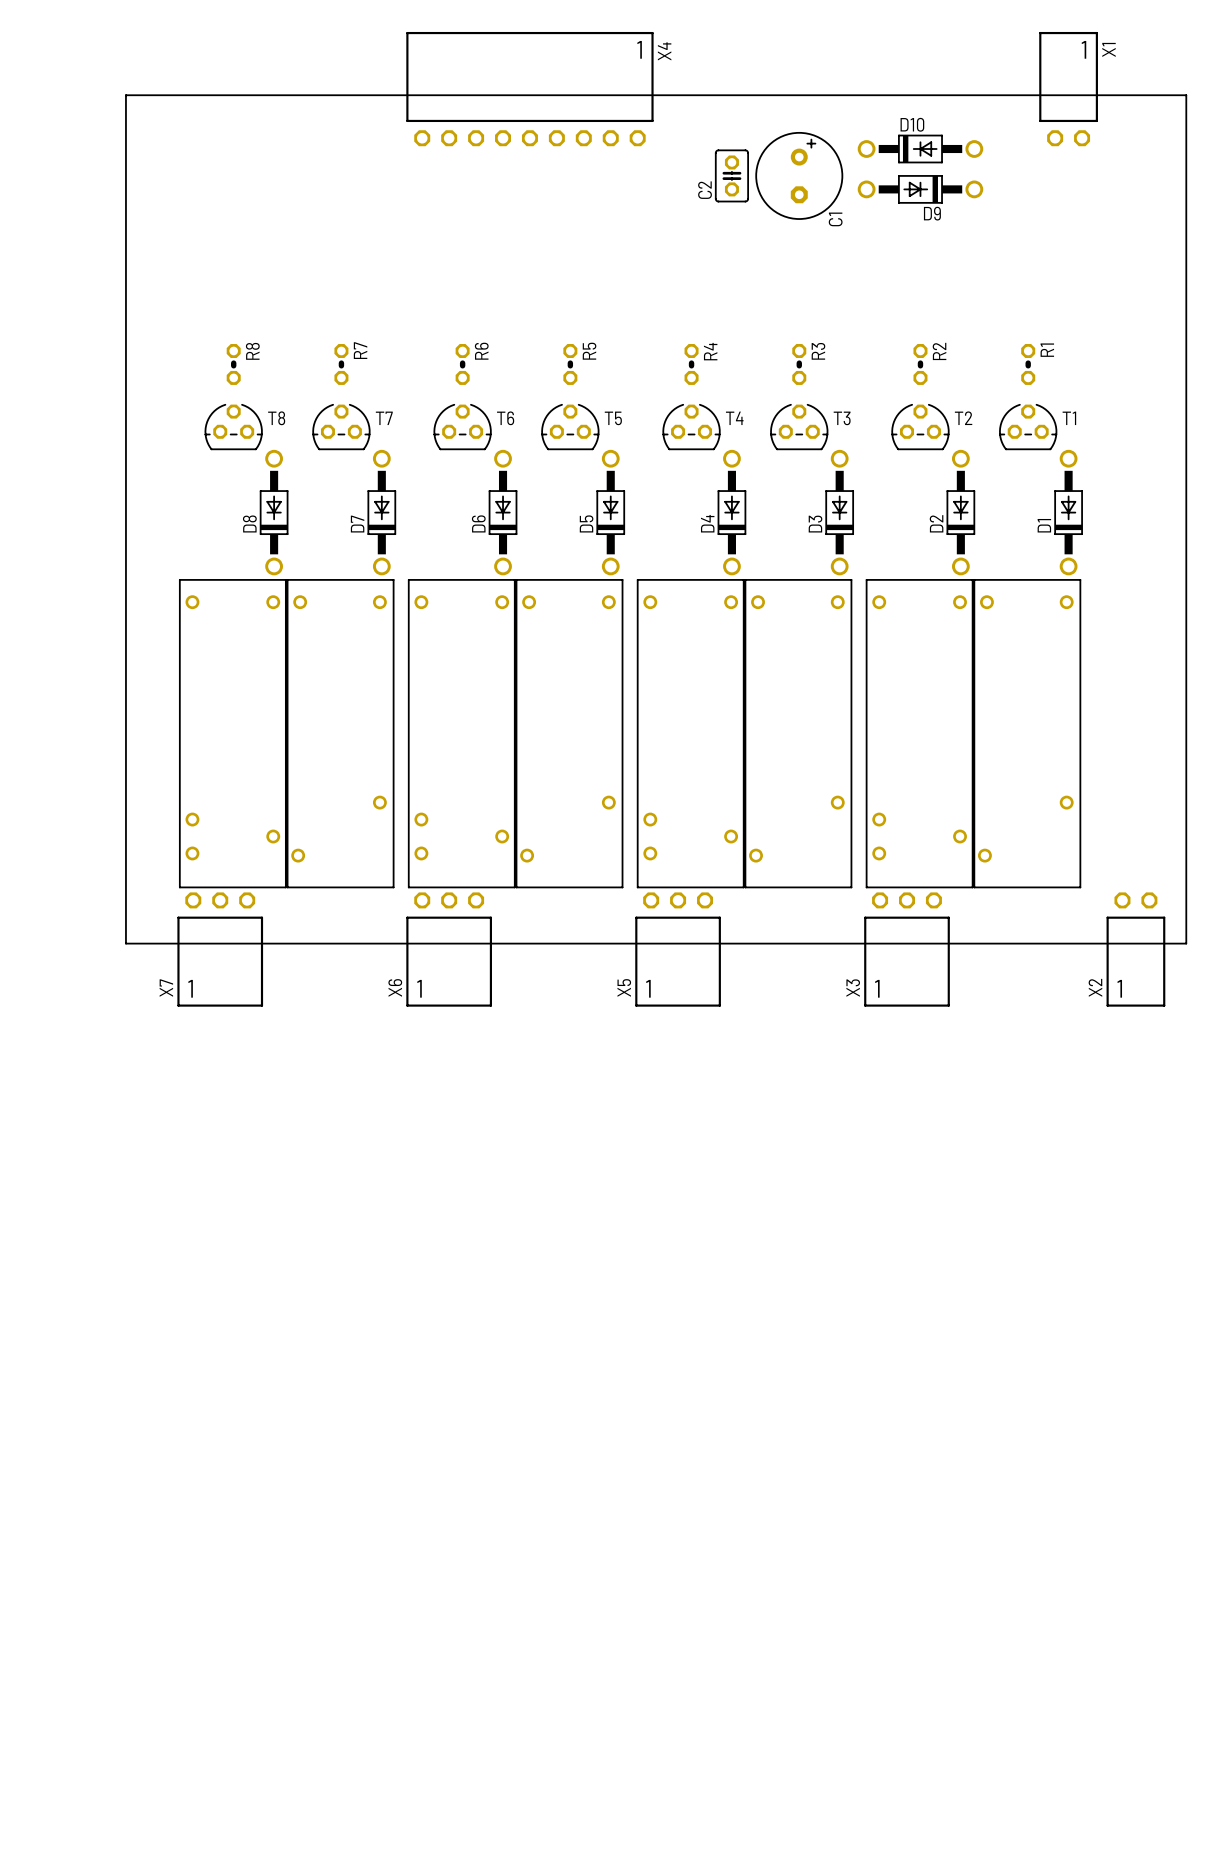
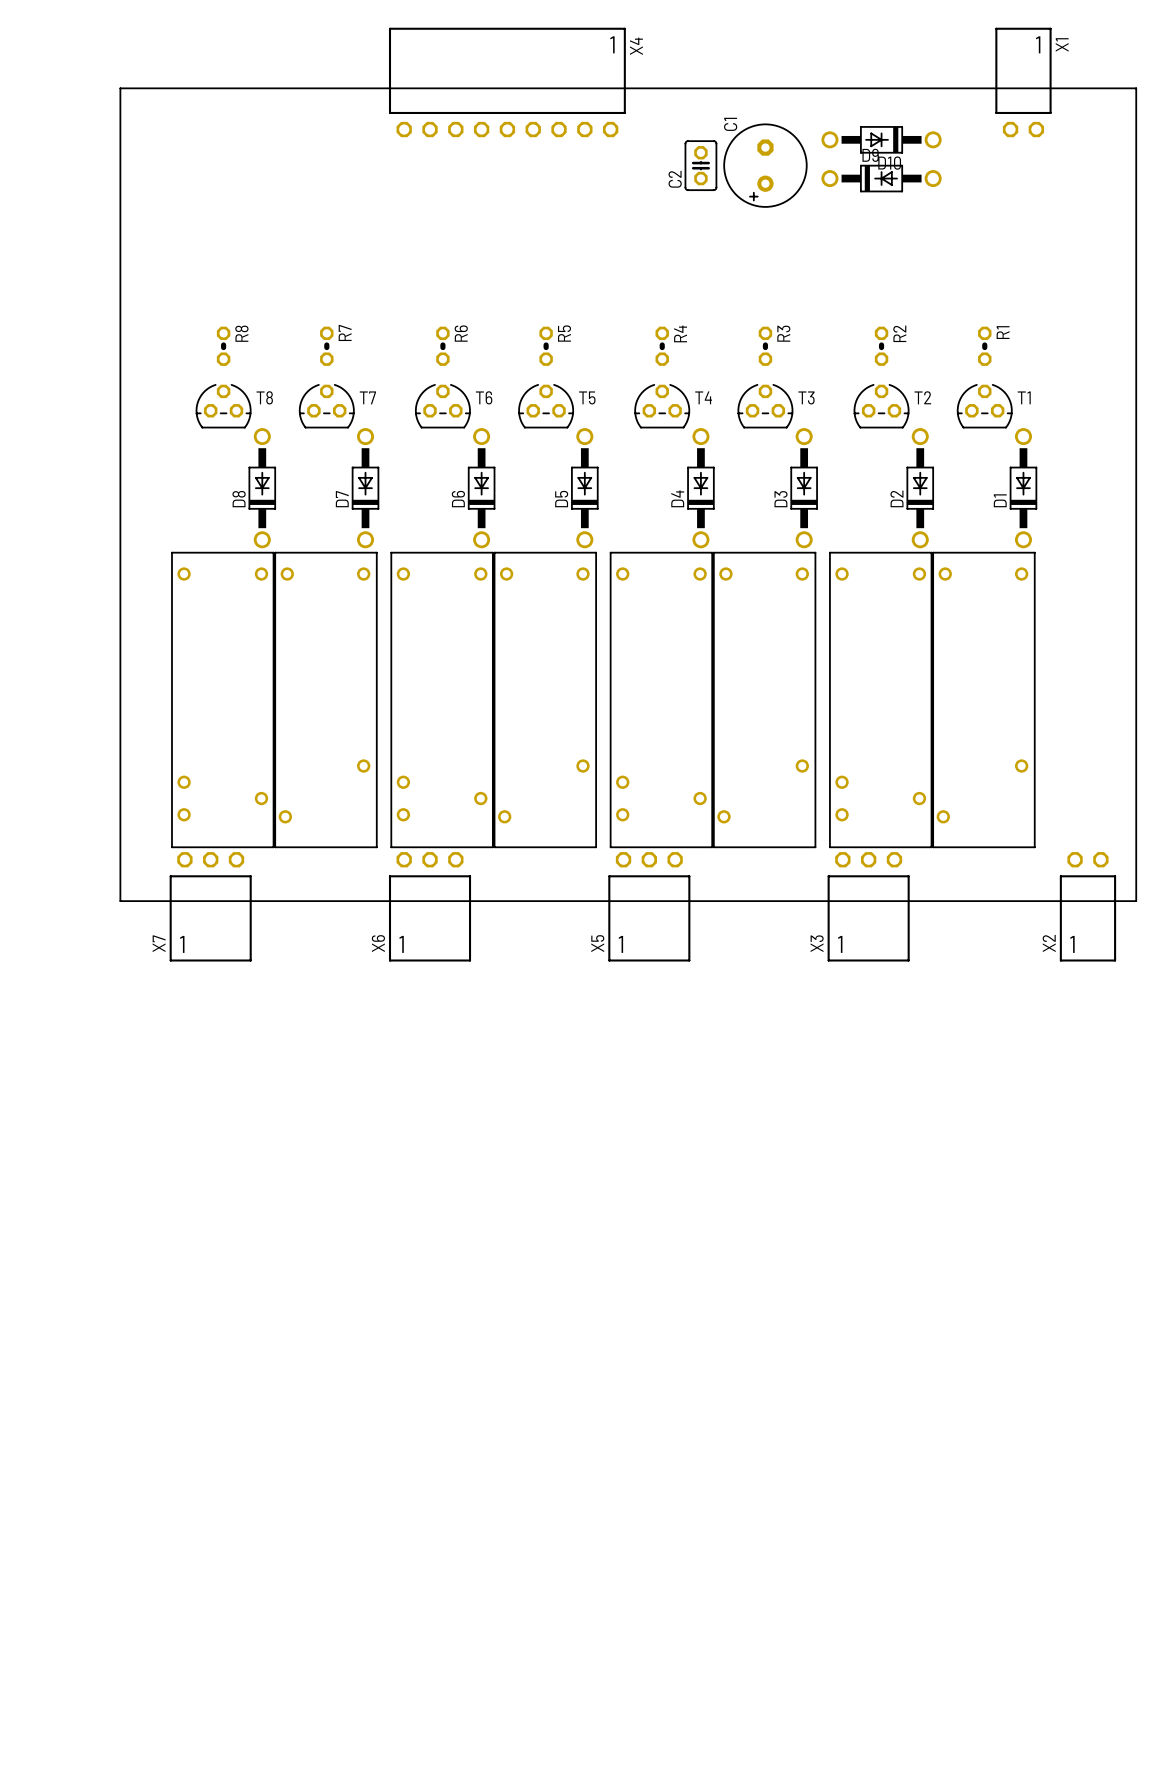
D10 rotation: 0° (920, 149) -> 180° (881, 139)
C1 rotation: 0° (799, 175) -> 180° (765, 165)
D9 rotation: 0° (920, 189) -> 180° (881, 178)

